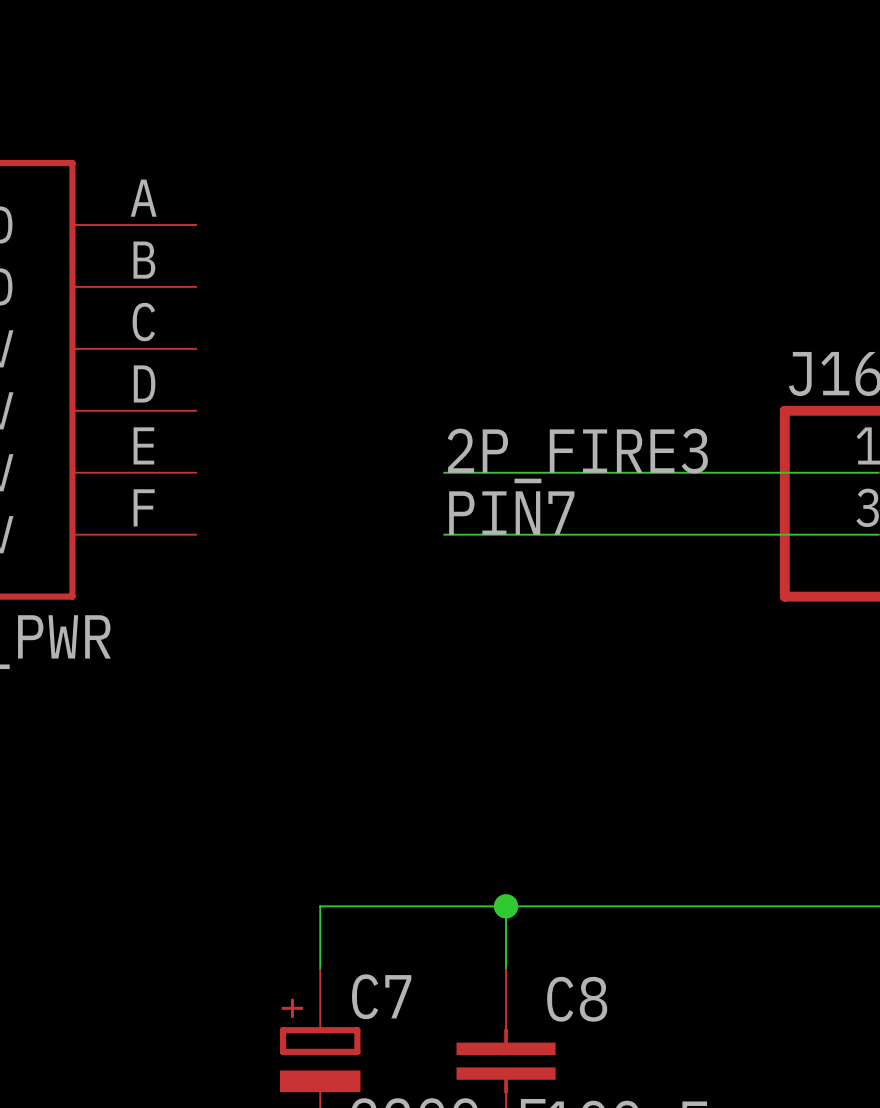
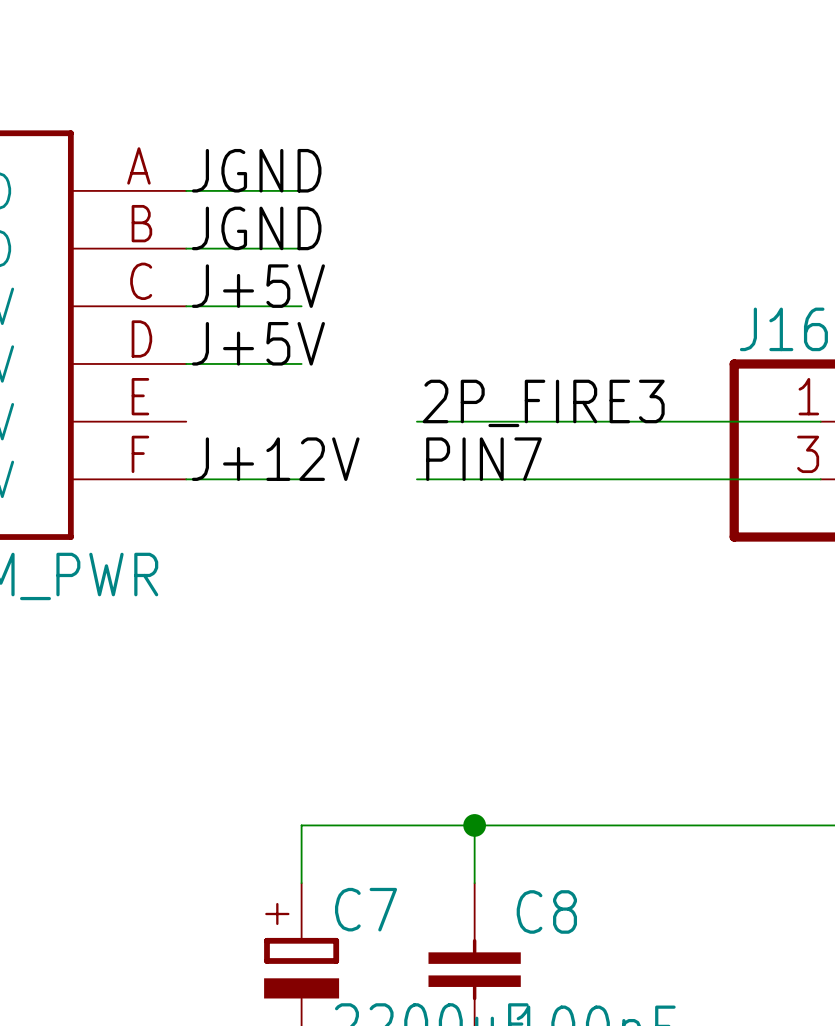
label: none -> JGND (256, 170)
wire: none -> (186, 190) (301, 190)
label: none -> JGND (256, 228)
wire: none -> (186, 248) (301, 248)
label: none -> J+5V (258, 286)
wire: none -> (186, 306) (301, 306)
label: none -> J+5V (258, 343)
wire: none -> (186, 363) (301, 363)
label: none -> J+12V (275, 459)
wire: none -> (186, 479) (301, 479)

